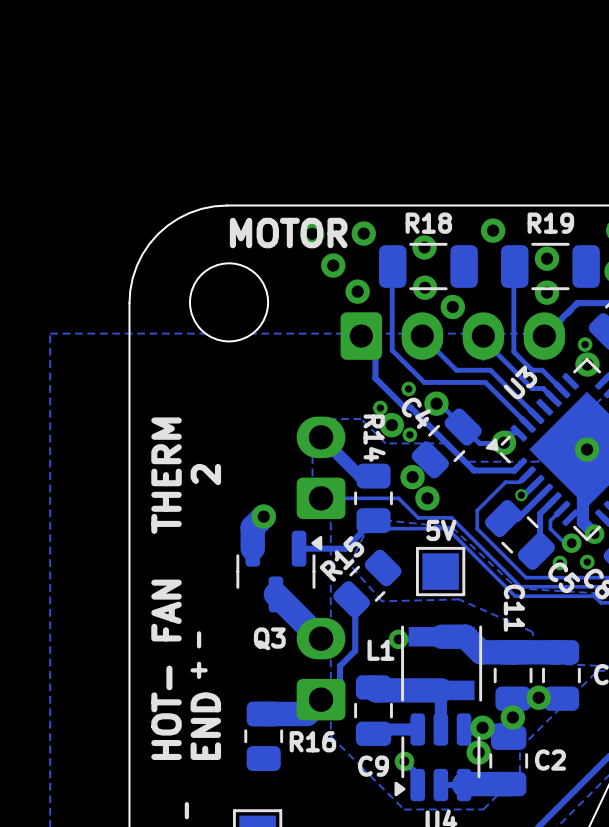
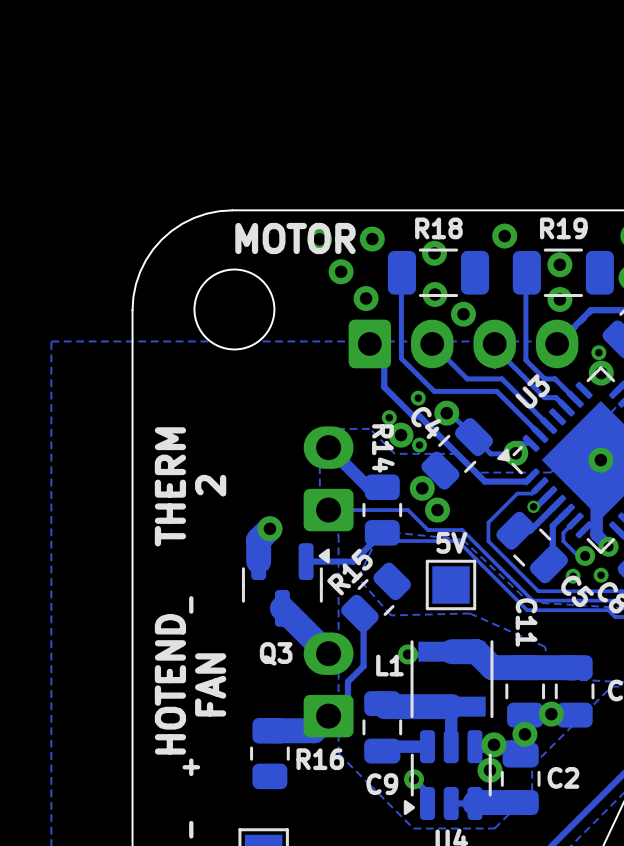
text position: - (199, 639) -> - (191, 604)
text: HOT- FAN (166, 669) -> none
text: none -> FAN (210, 684)
text: + (199, 670) -> HOTEND (170, 684)
text: END (205, 726) -> none
text: none -> + (191, 767)

